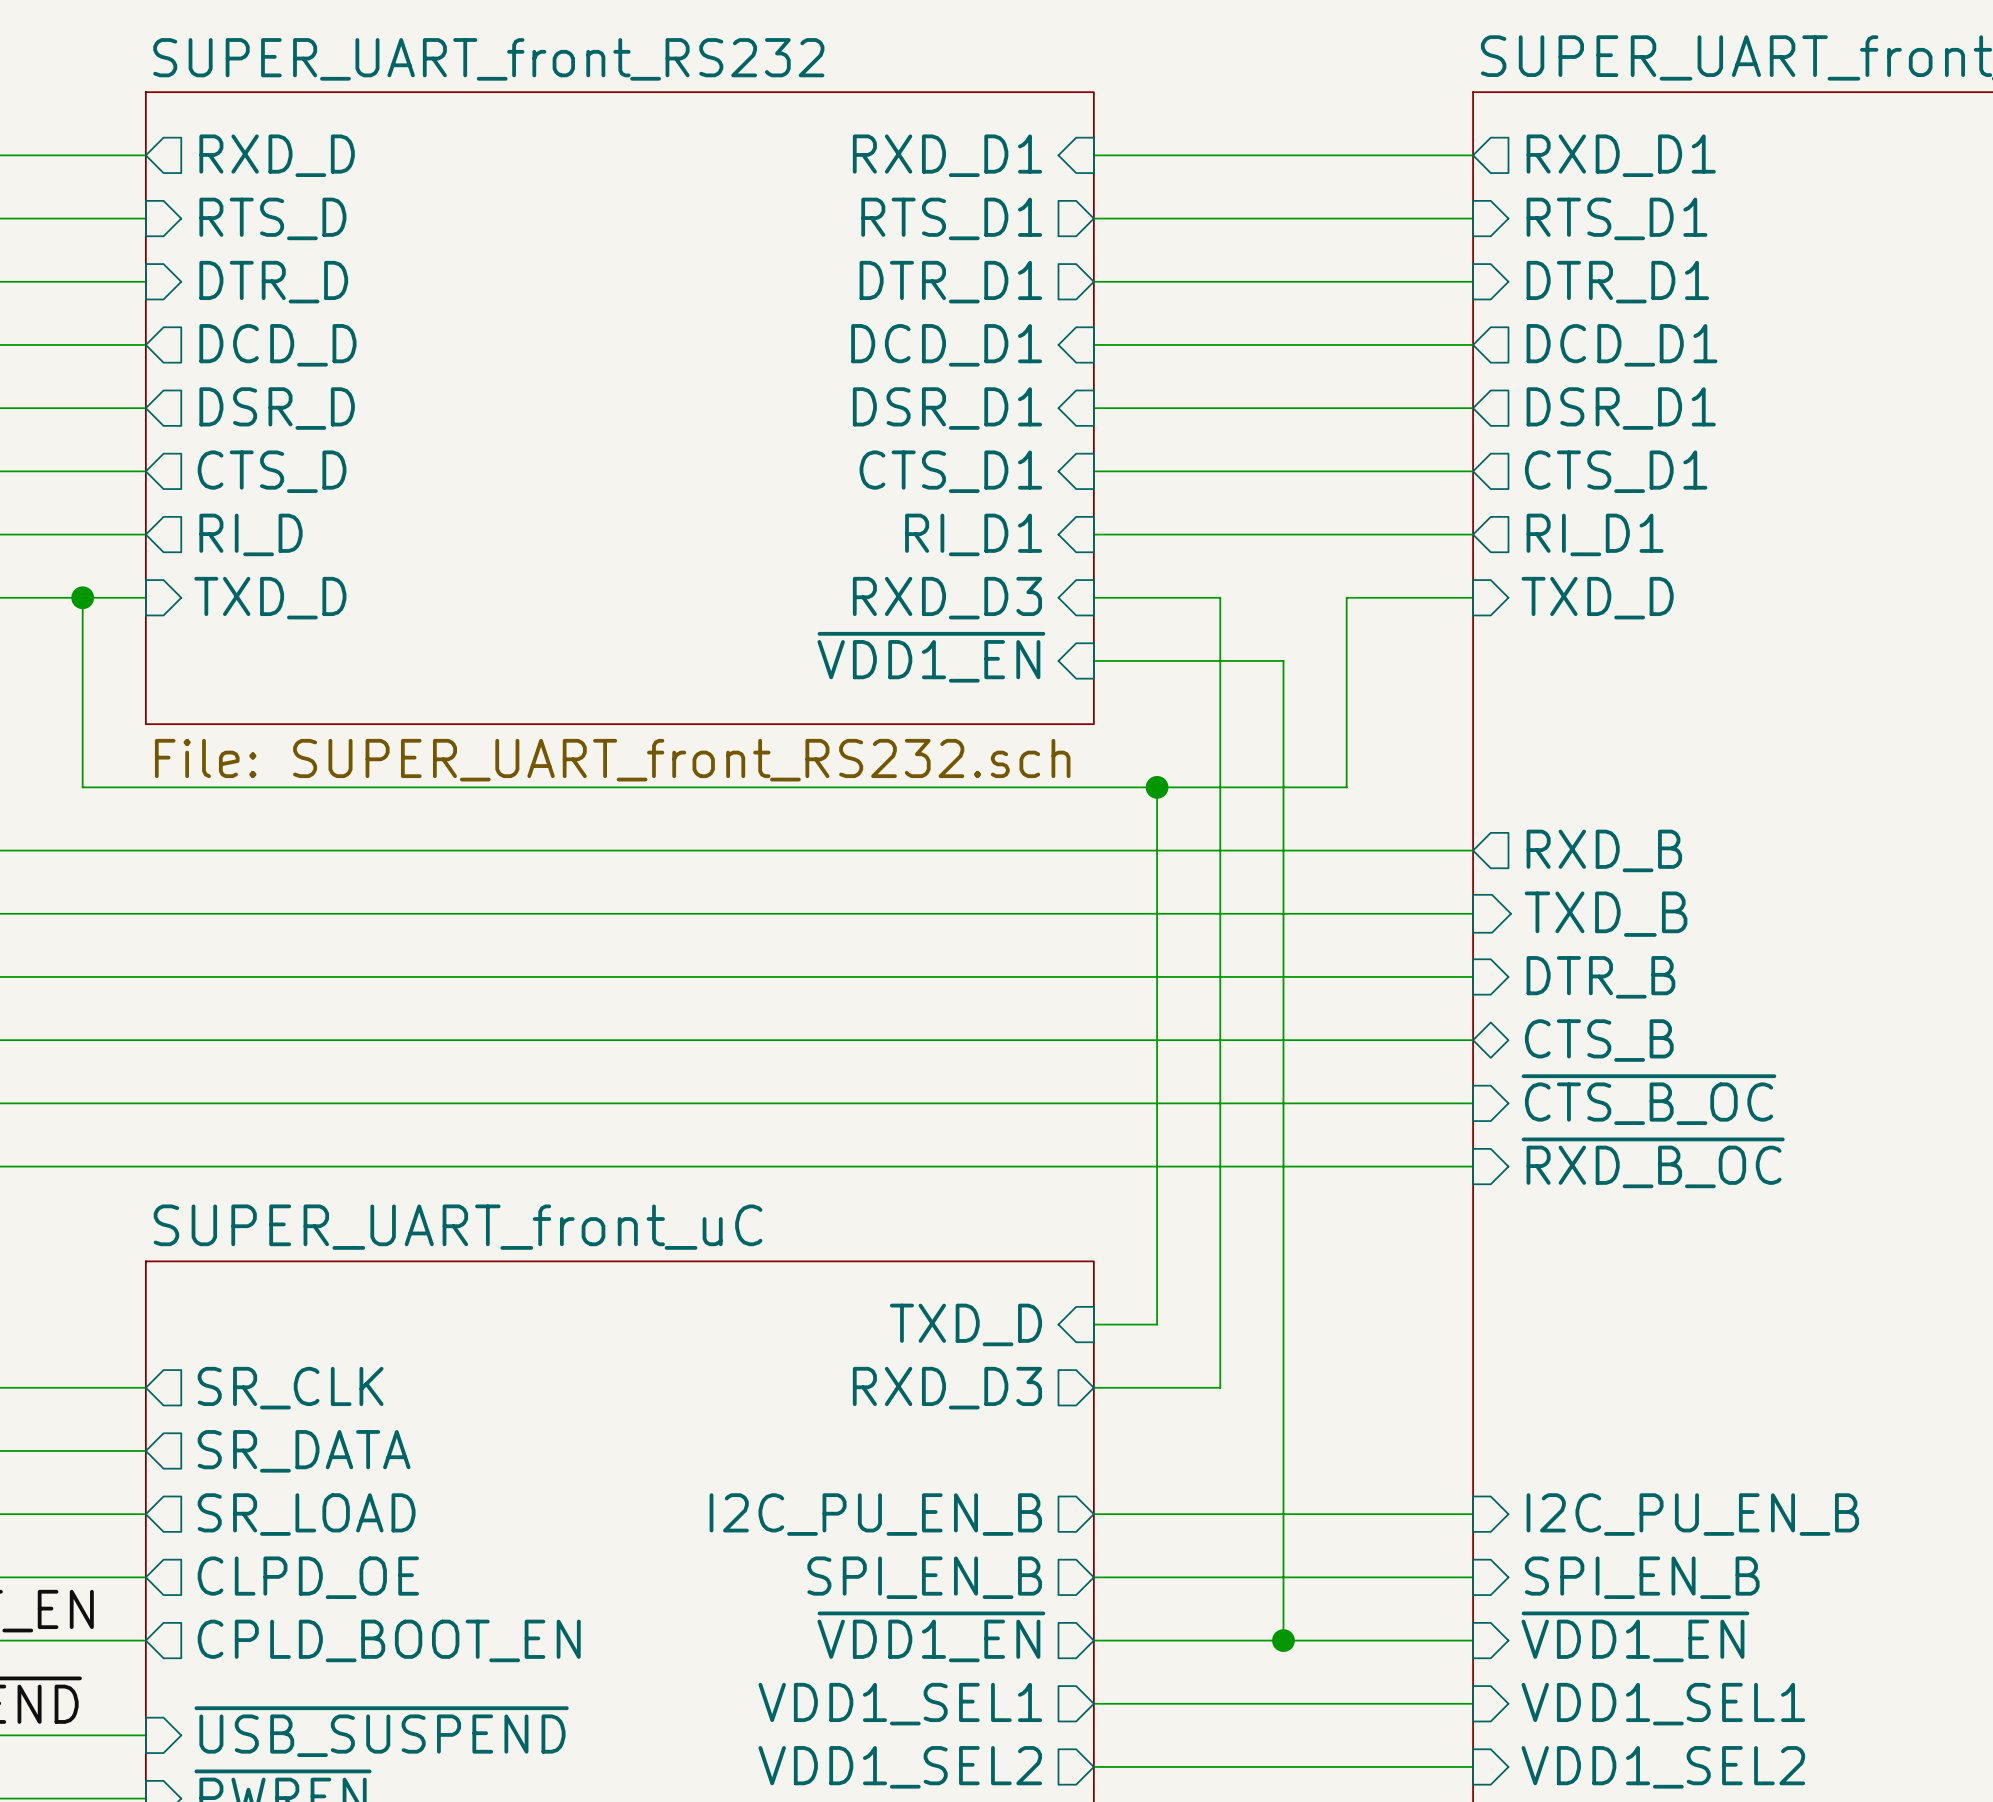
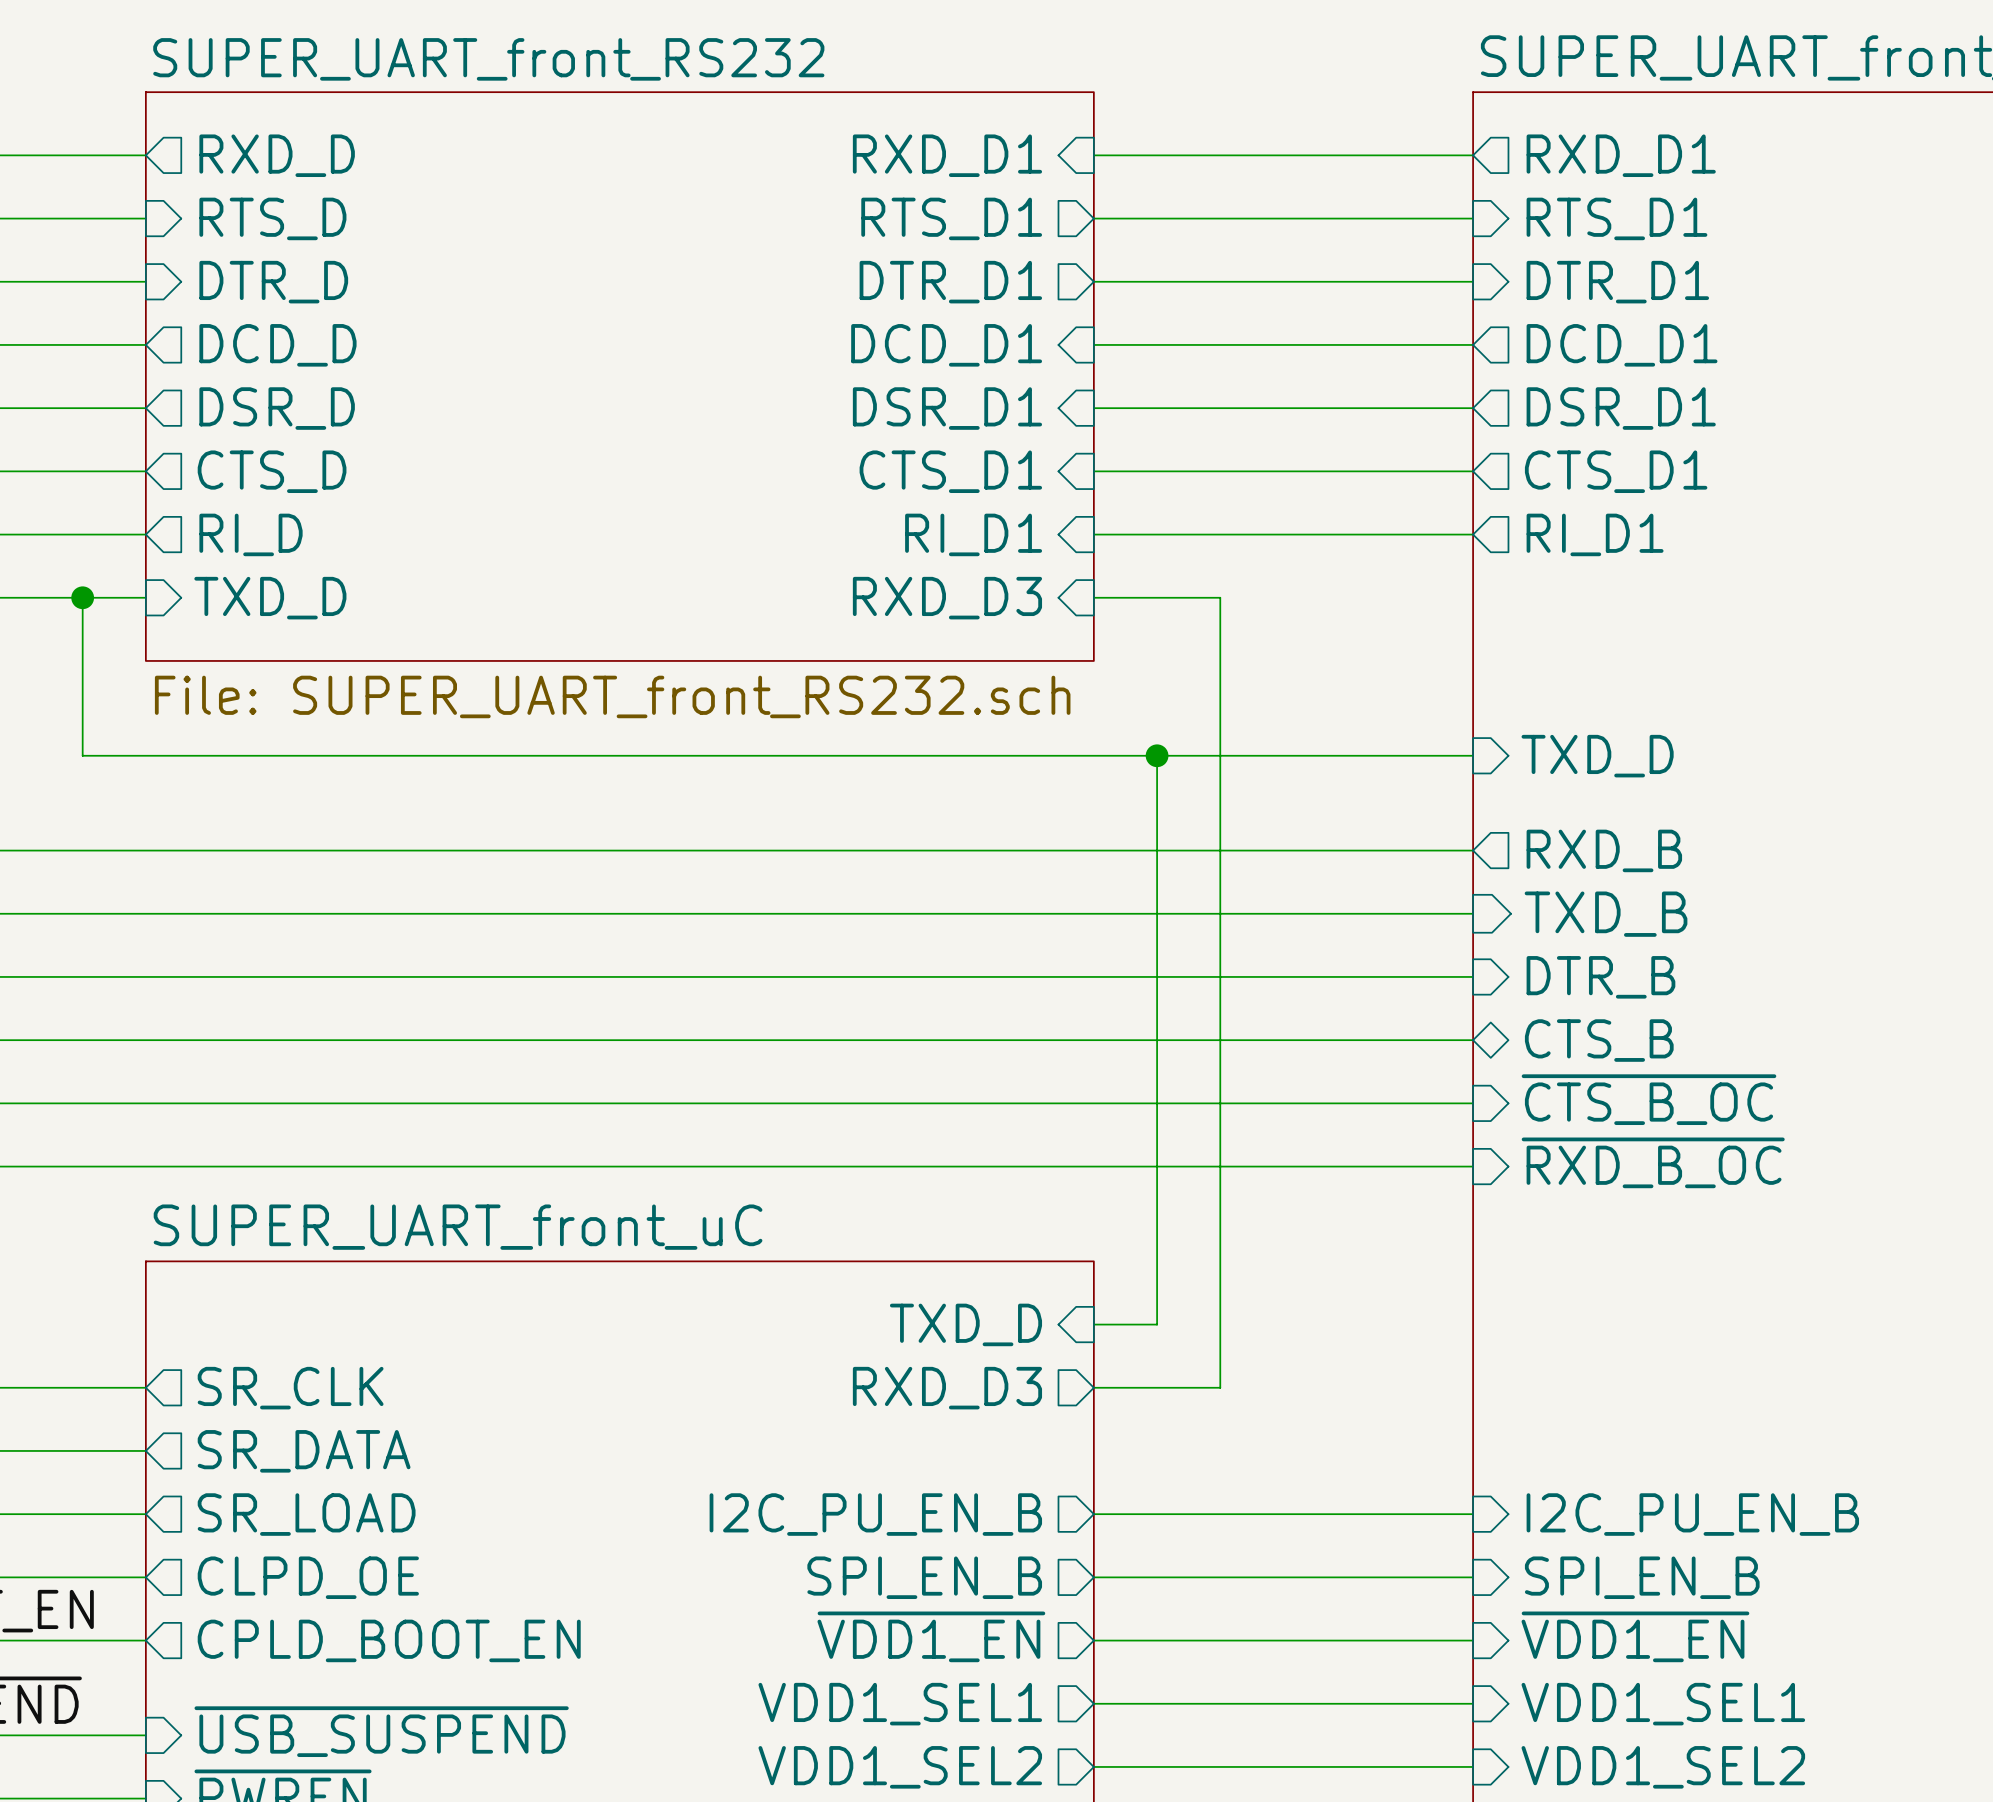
sheet SUPER_UART_front_RS232 shape: [145, 92, 1094, 725] -> [145, 92, 1094, 661]
wire: (1473, 597) (1346, 597) (1346, 787) (82, 787) (82, 755) -> (1473, 755) (82, 755)
sheet pin position: TXD_D (1597, 598) -> TXD_D (1597, 756)
sheet pin: ~{VDD1_EN} (931, 657) -> none
wire: (1093, 660) (1283, 660) (1283, 1640) -> none
wire: none -> (1157, 755) (1157, 787)
junction position: (1157, 787) -> (1157, 755)
junction: (1283, 1640) -> none

